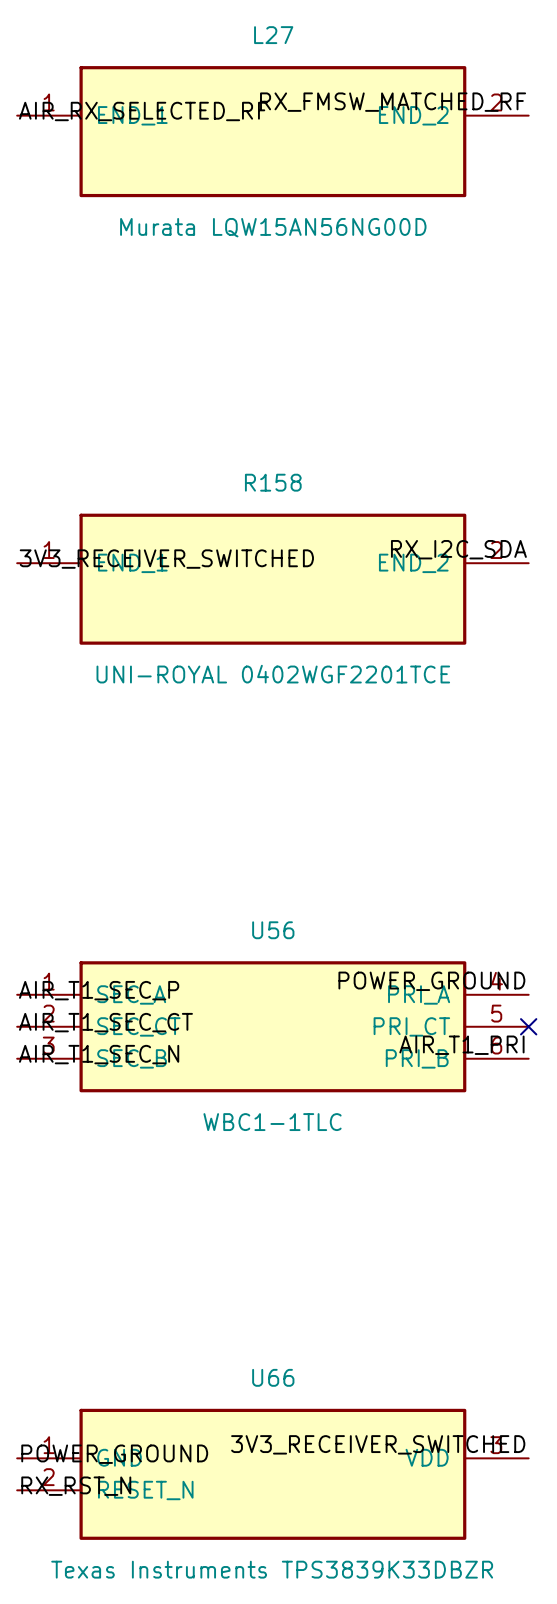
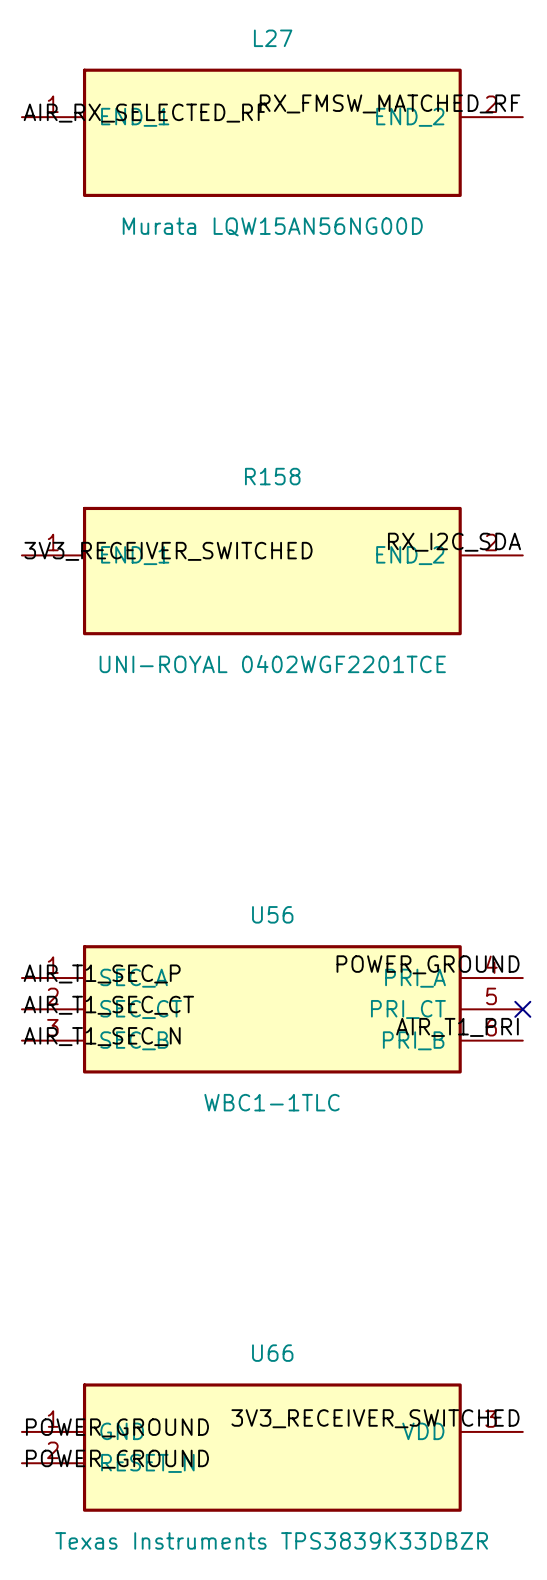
label: RX_RST_N (76, 1486) -> POWER_GROUND (117, 1459)

